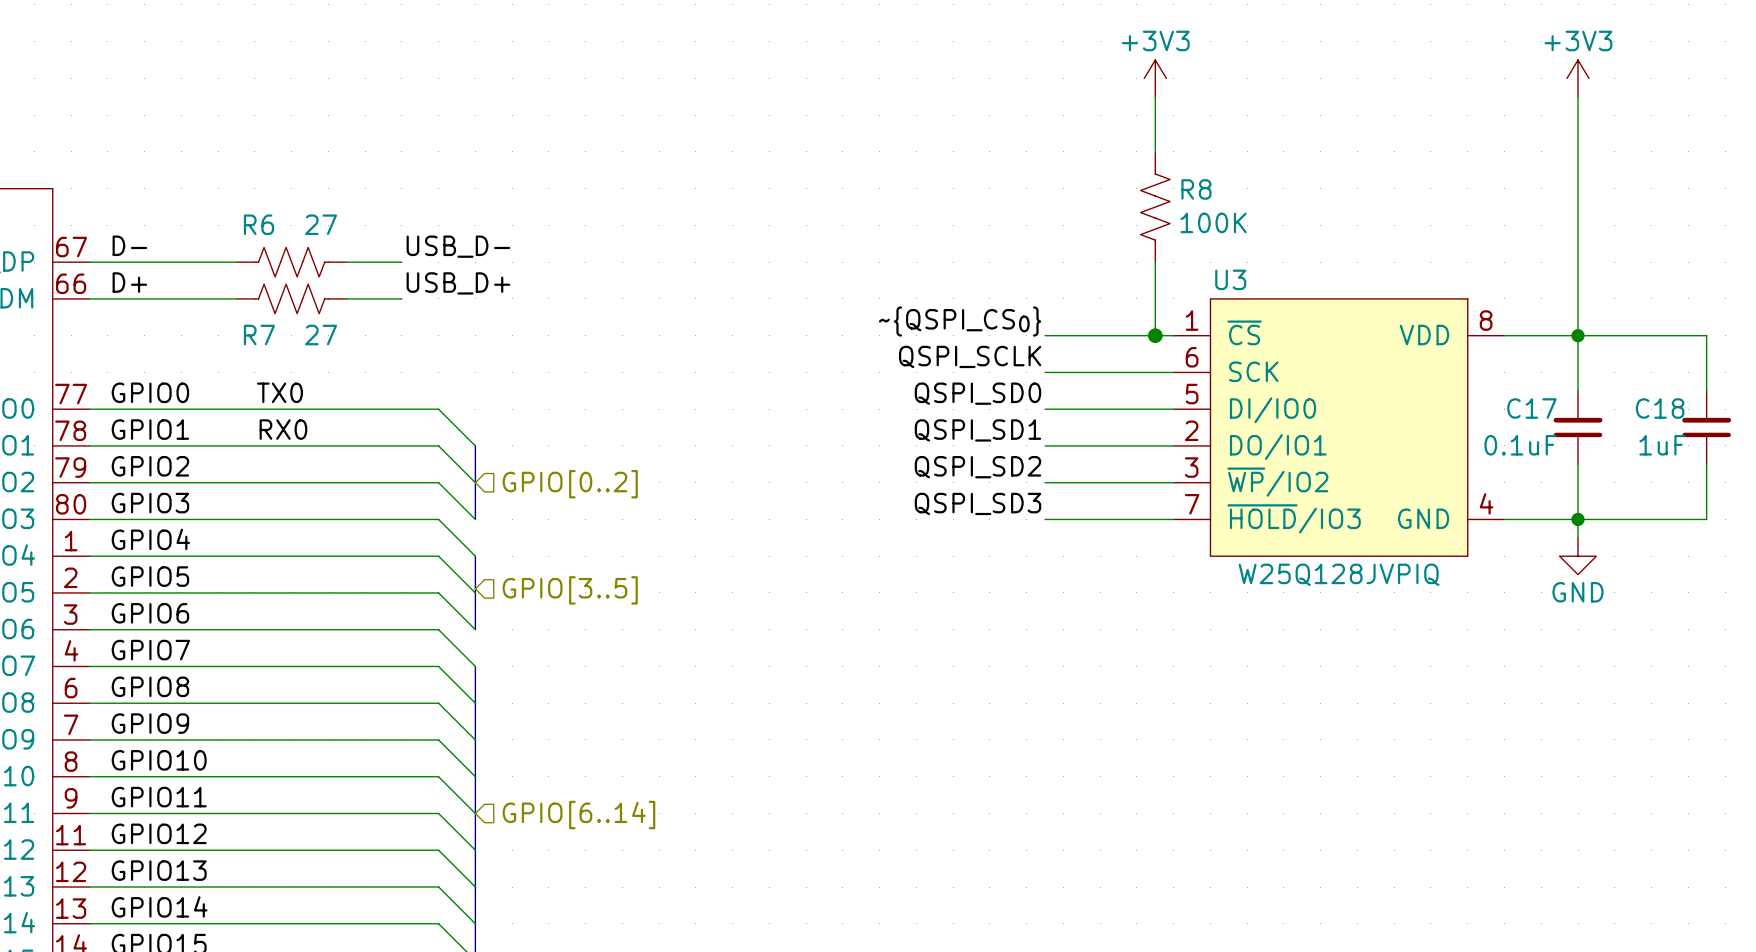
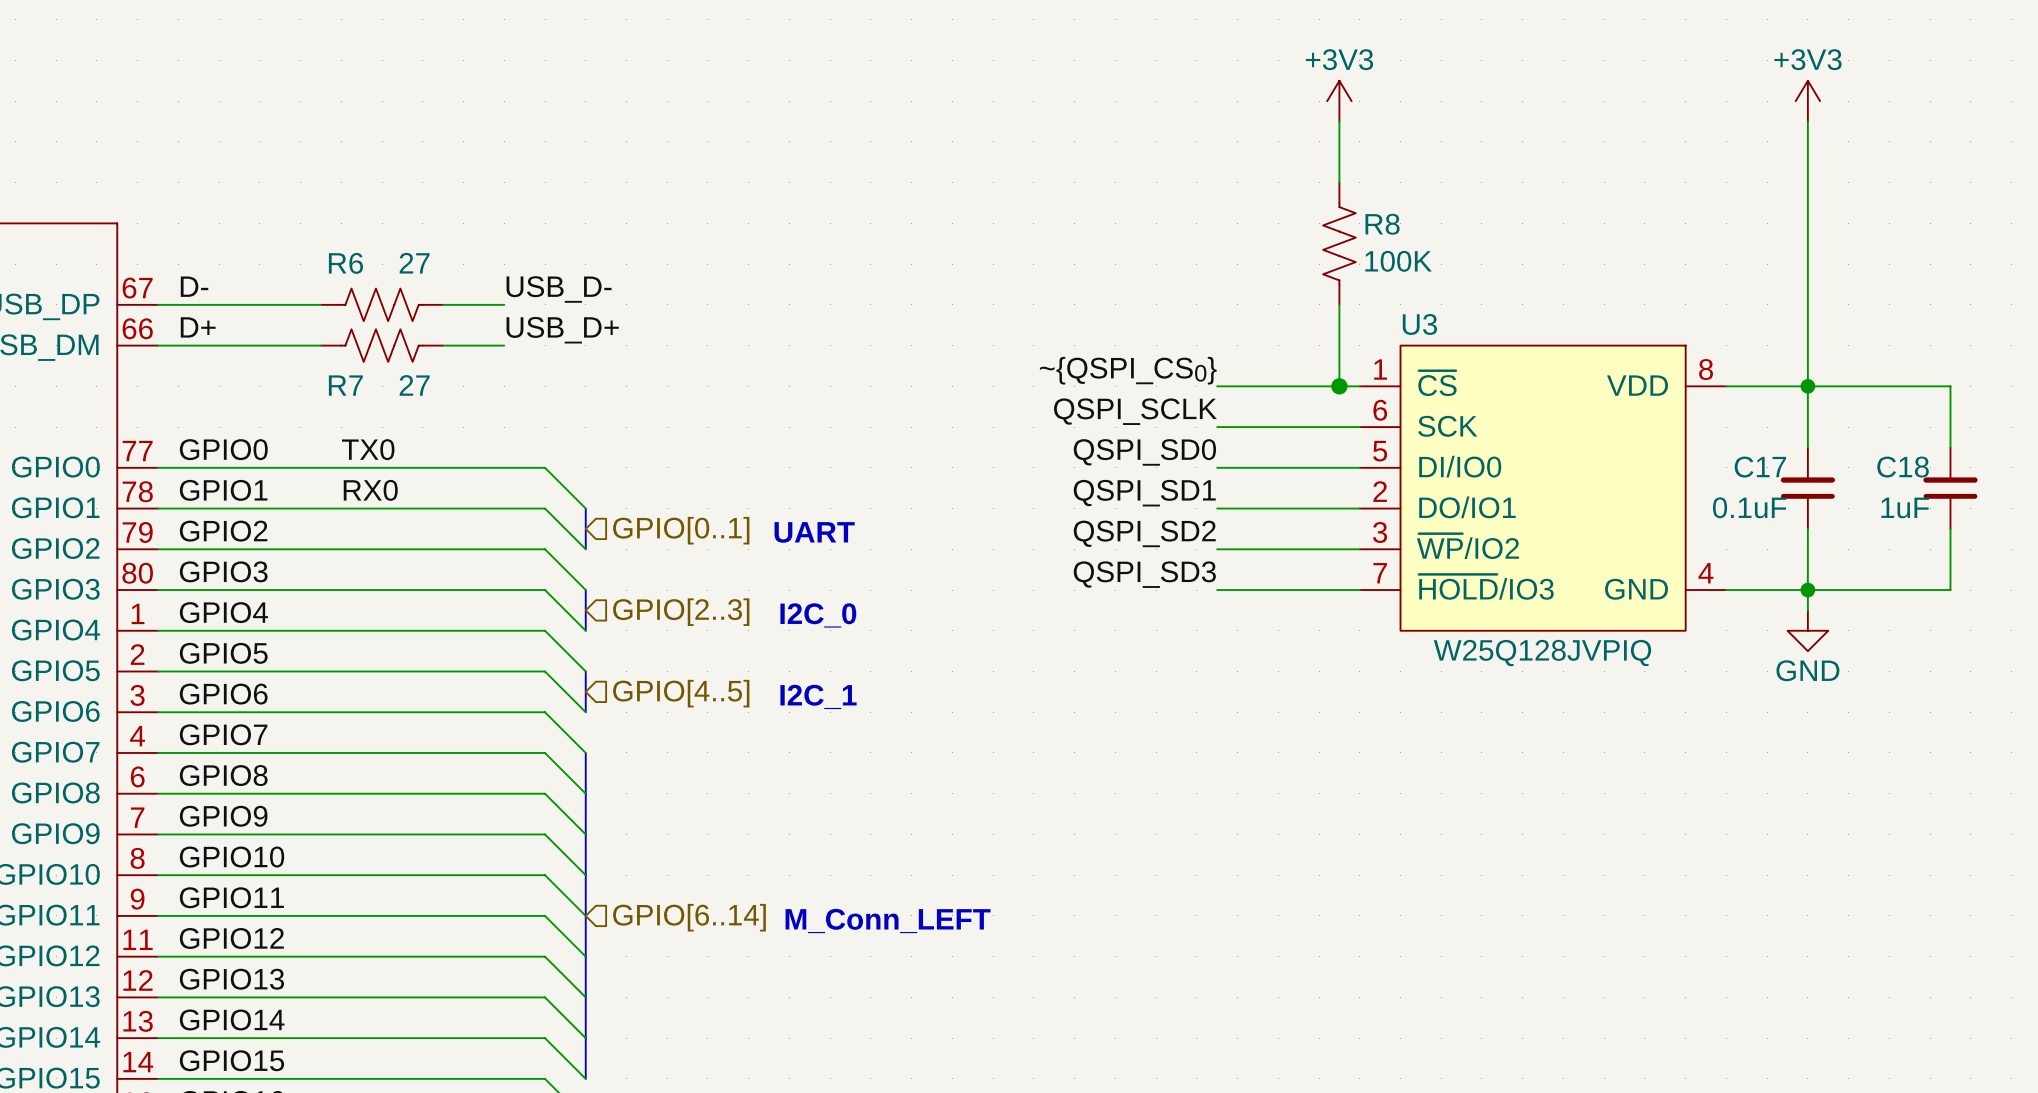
text: none -> UART (814, 532)
bus: (475, 482) (475, 519) -> none
hierarchical label: GPIO[0..2] (570, 484) -> GPIO[0..1] (681, 530)
hierarchical label: none -> GPIO[2..3] (681, 612)
text: none -> I2C_0 (818, 615)
bus: (475, 556) (475, 592) -> (585, 630) (585, 590)
hierarchical label: GPIO[3..5] (570, 590) -> GPIO[4..5] (681, 693)
text: none -> I2C_1 (818, 696)
text: none -> M_Conn_LEFT (888, 920)

